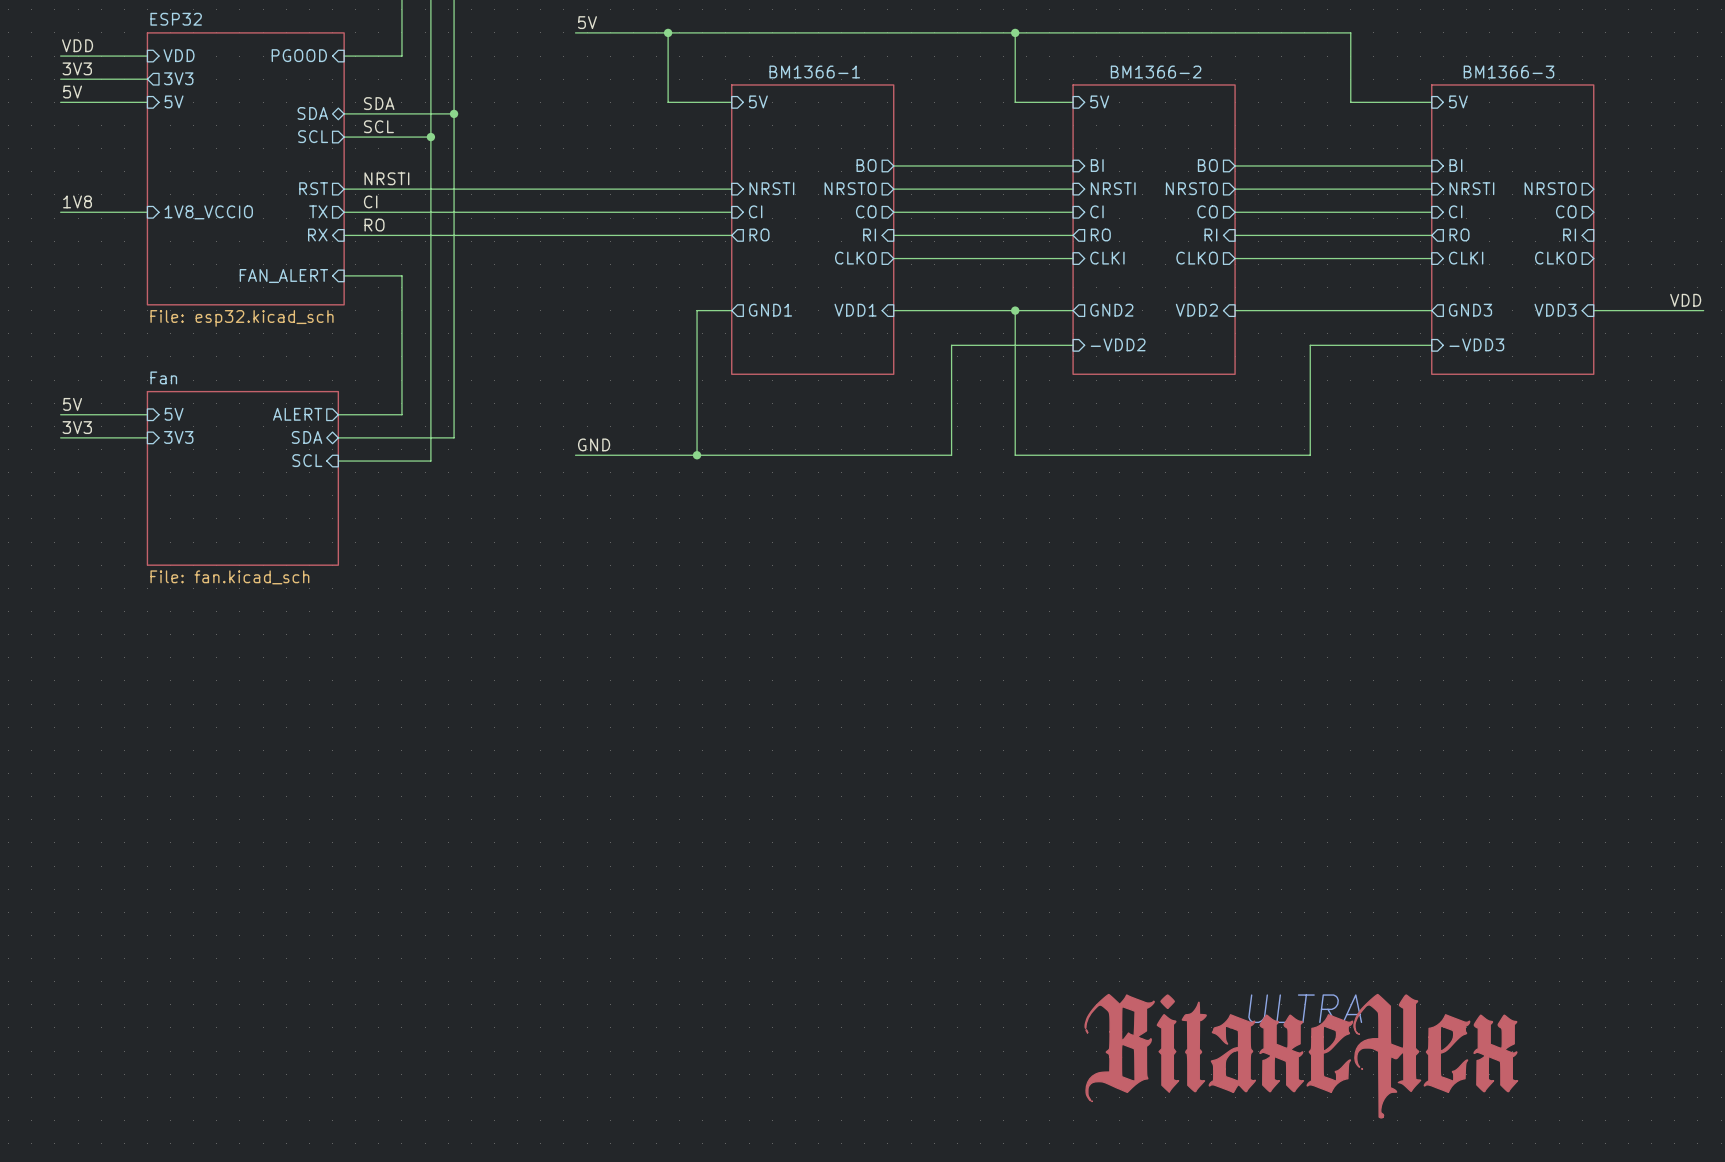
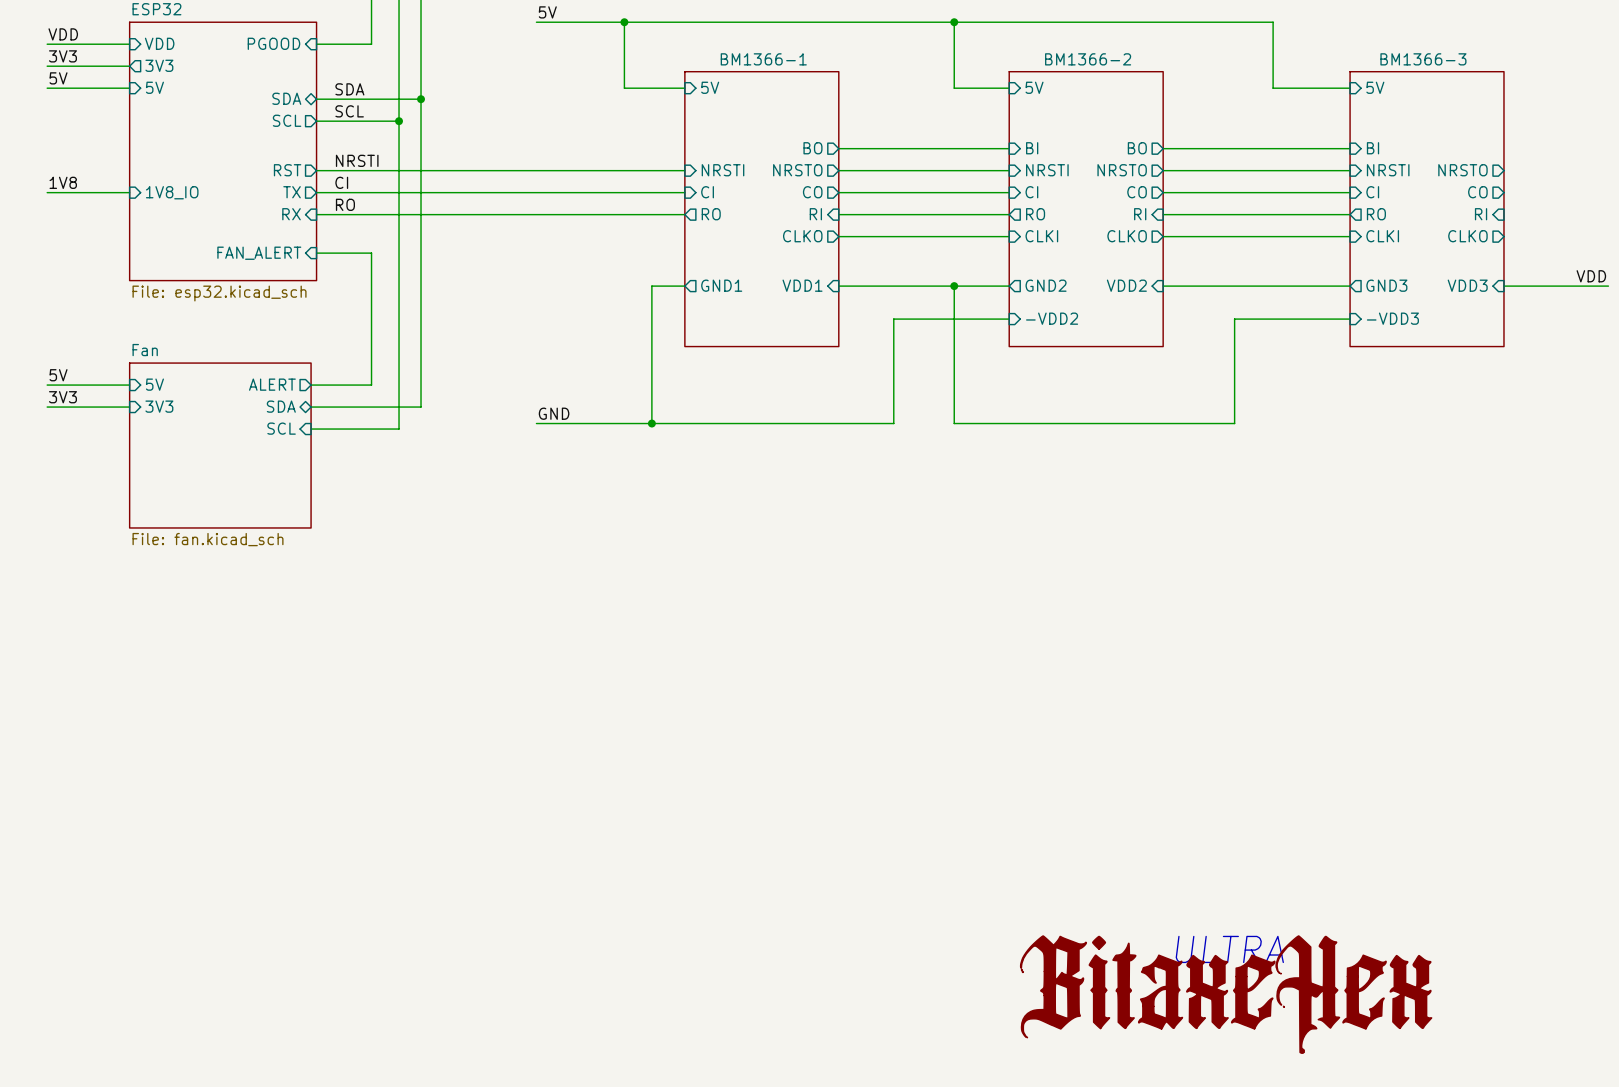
sheet pin: 1V8_VCCIO (208, 212) -> 1V8_IO (172, 192)

